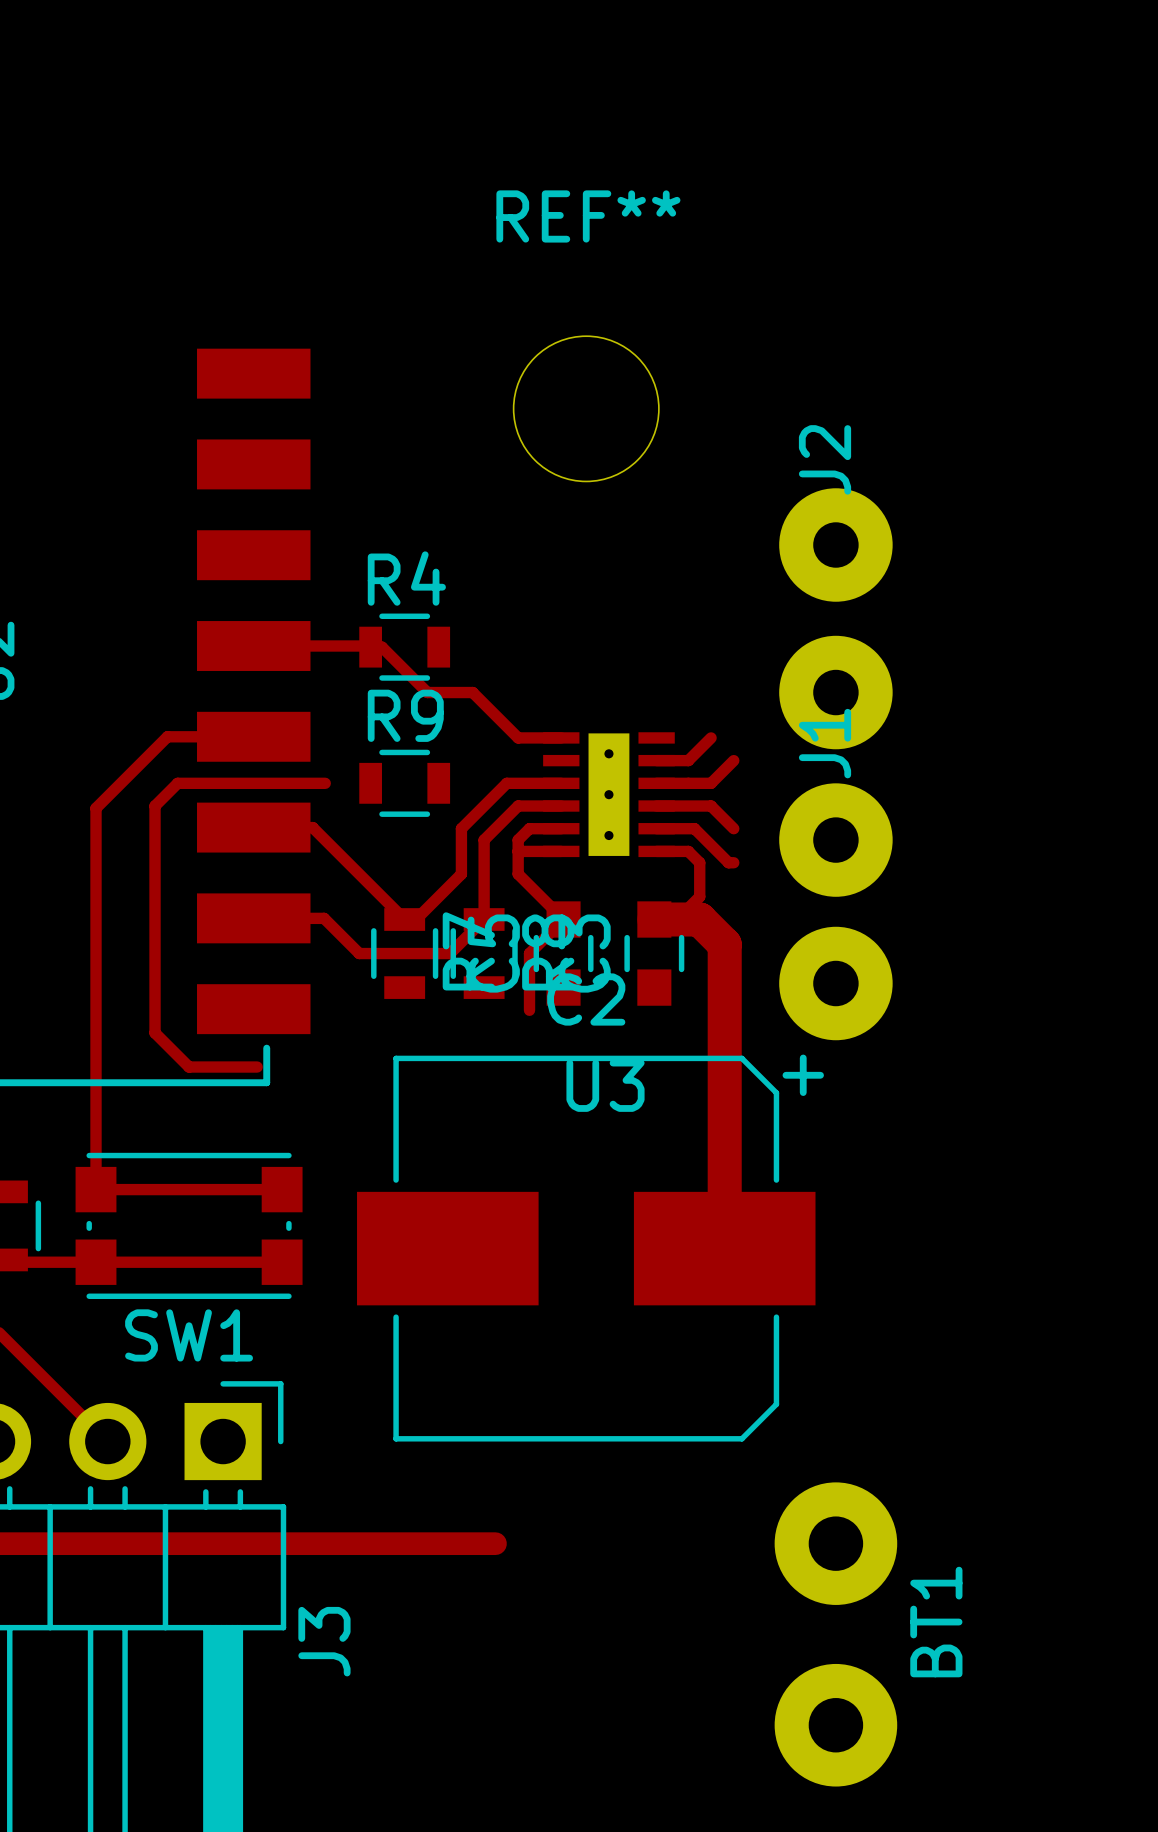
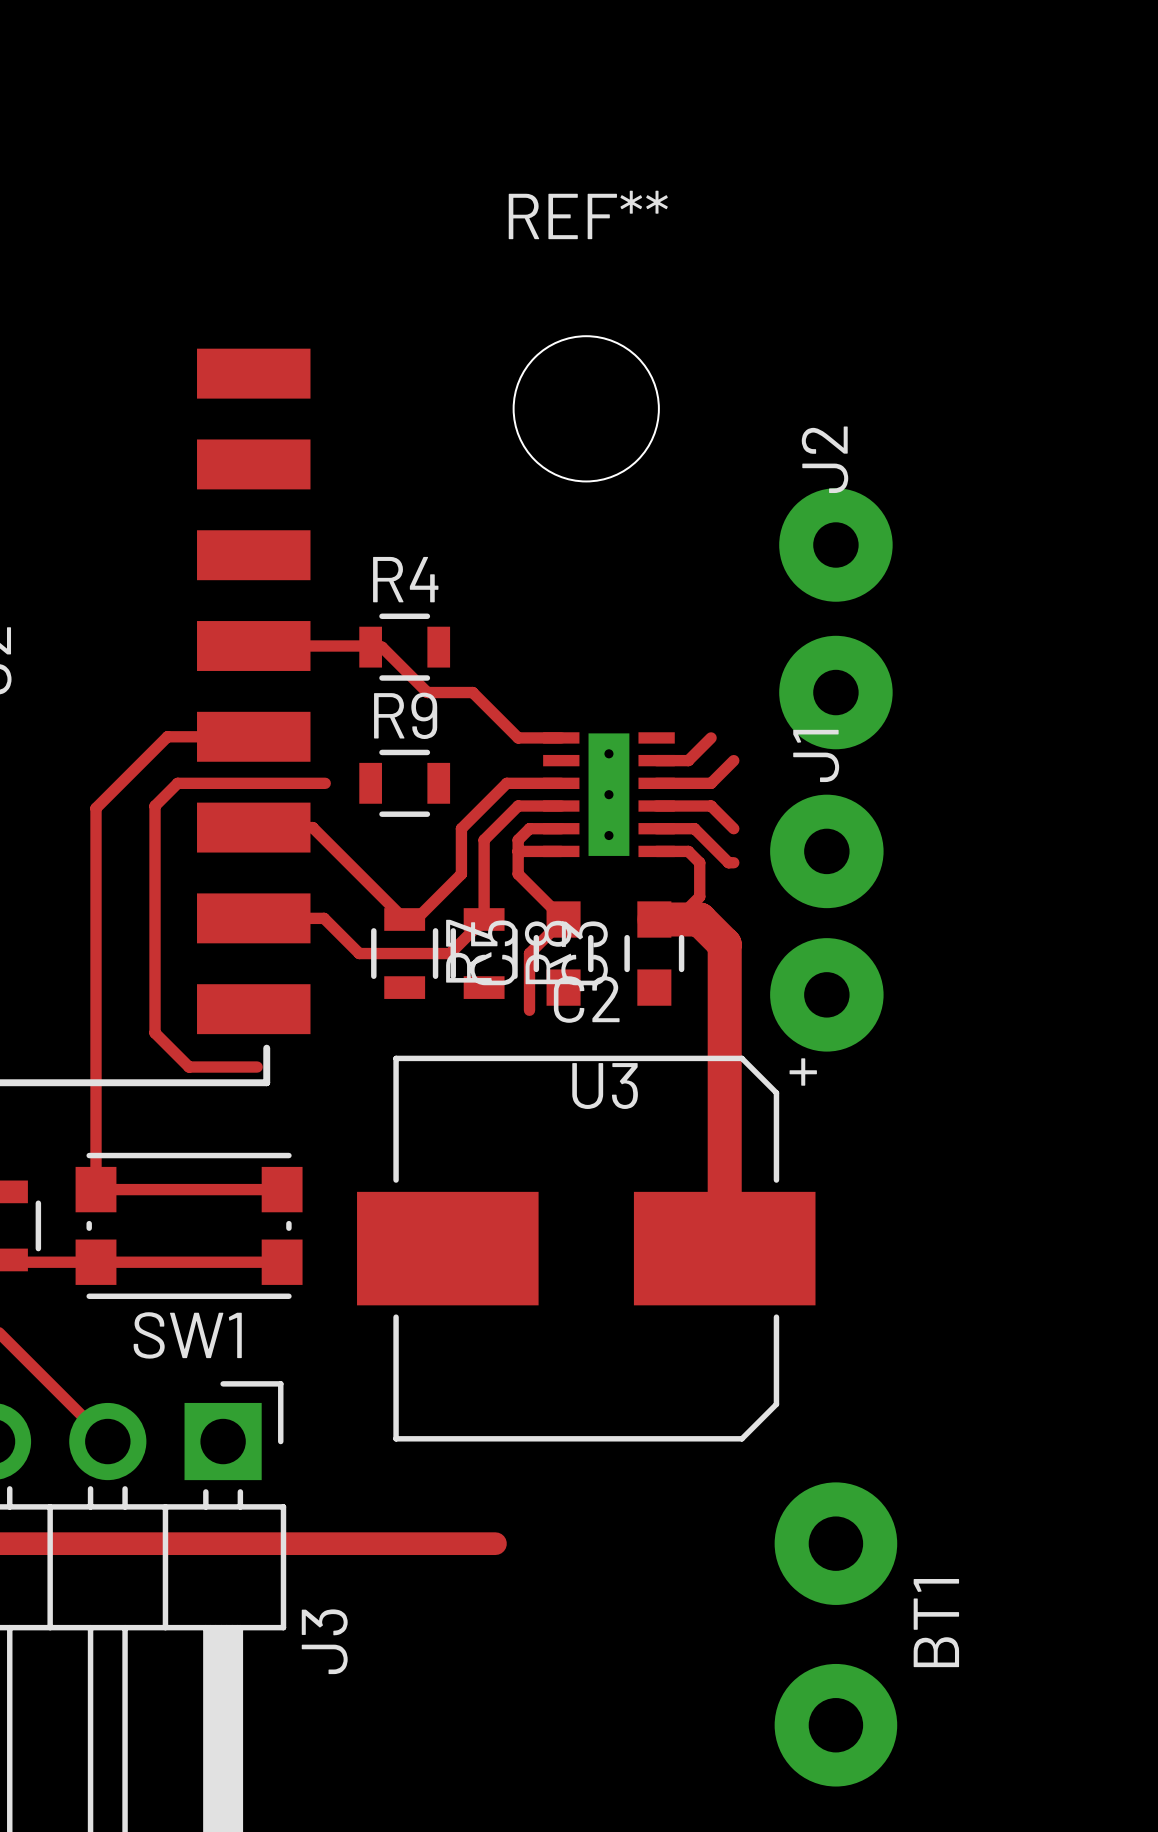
J1 position: (835, 911) -> (826, 923)

